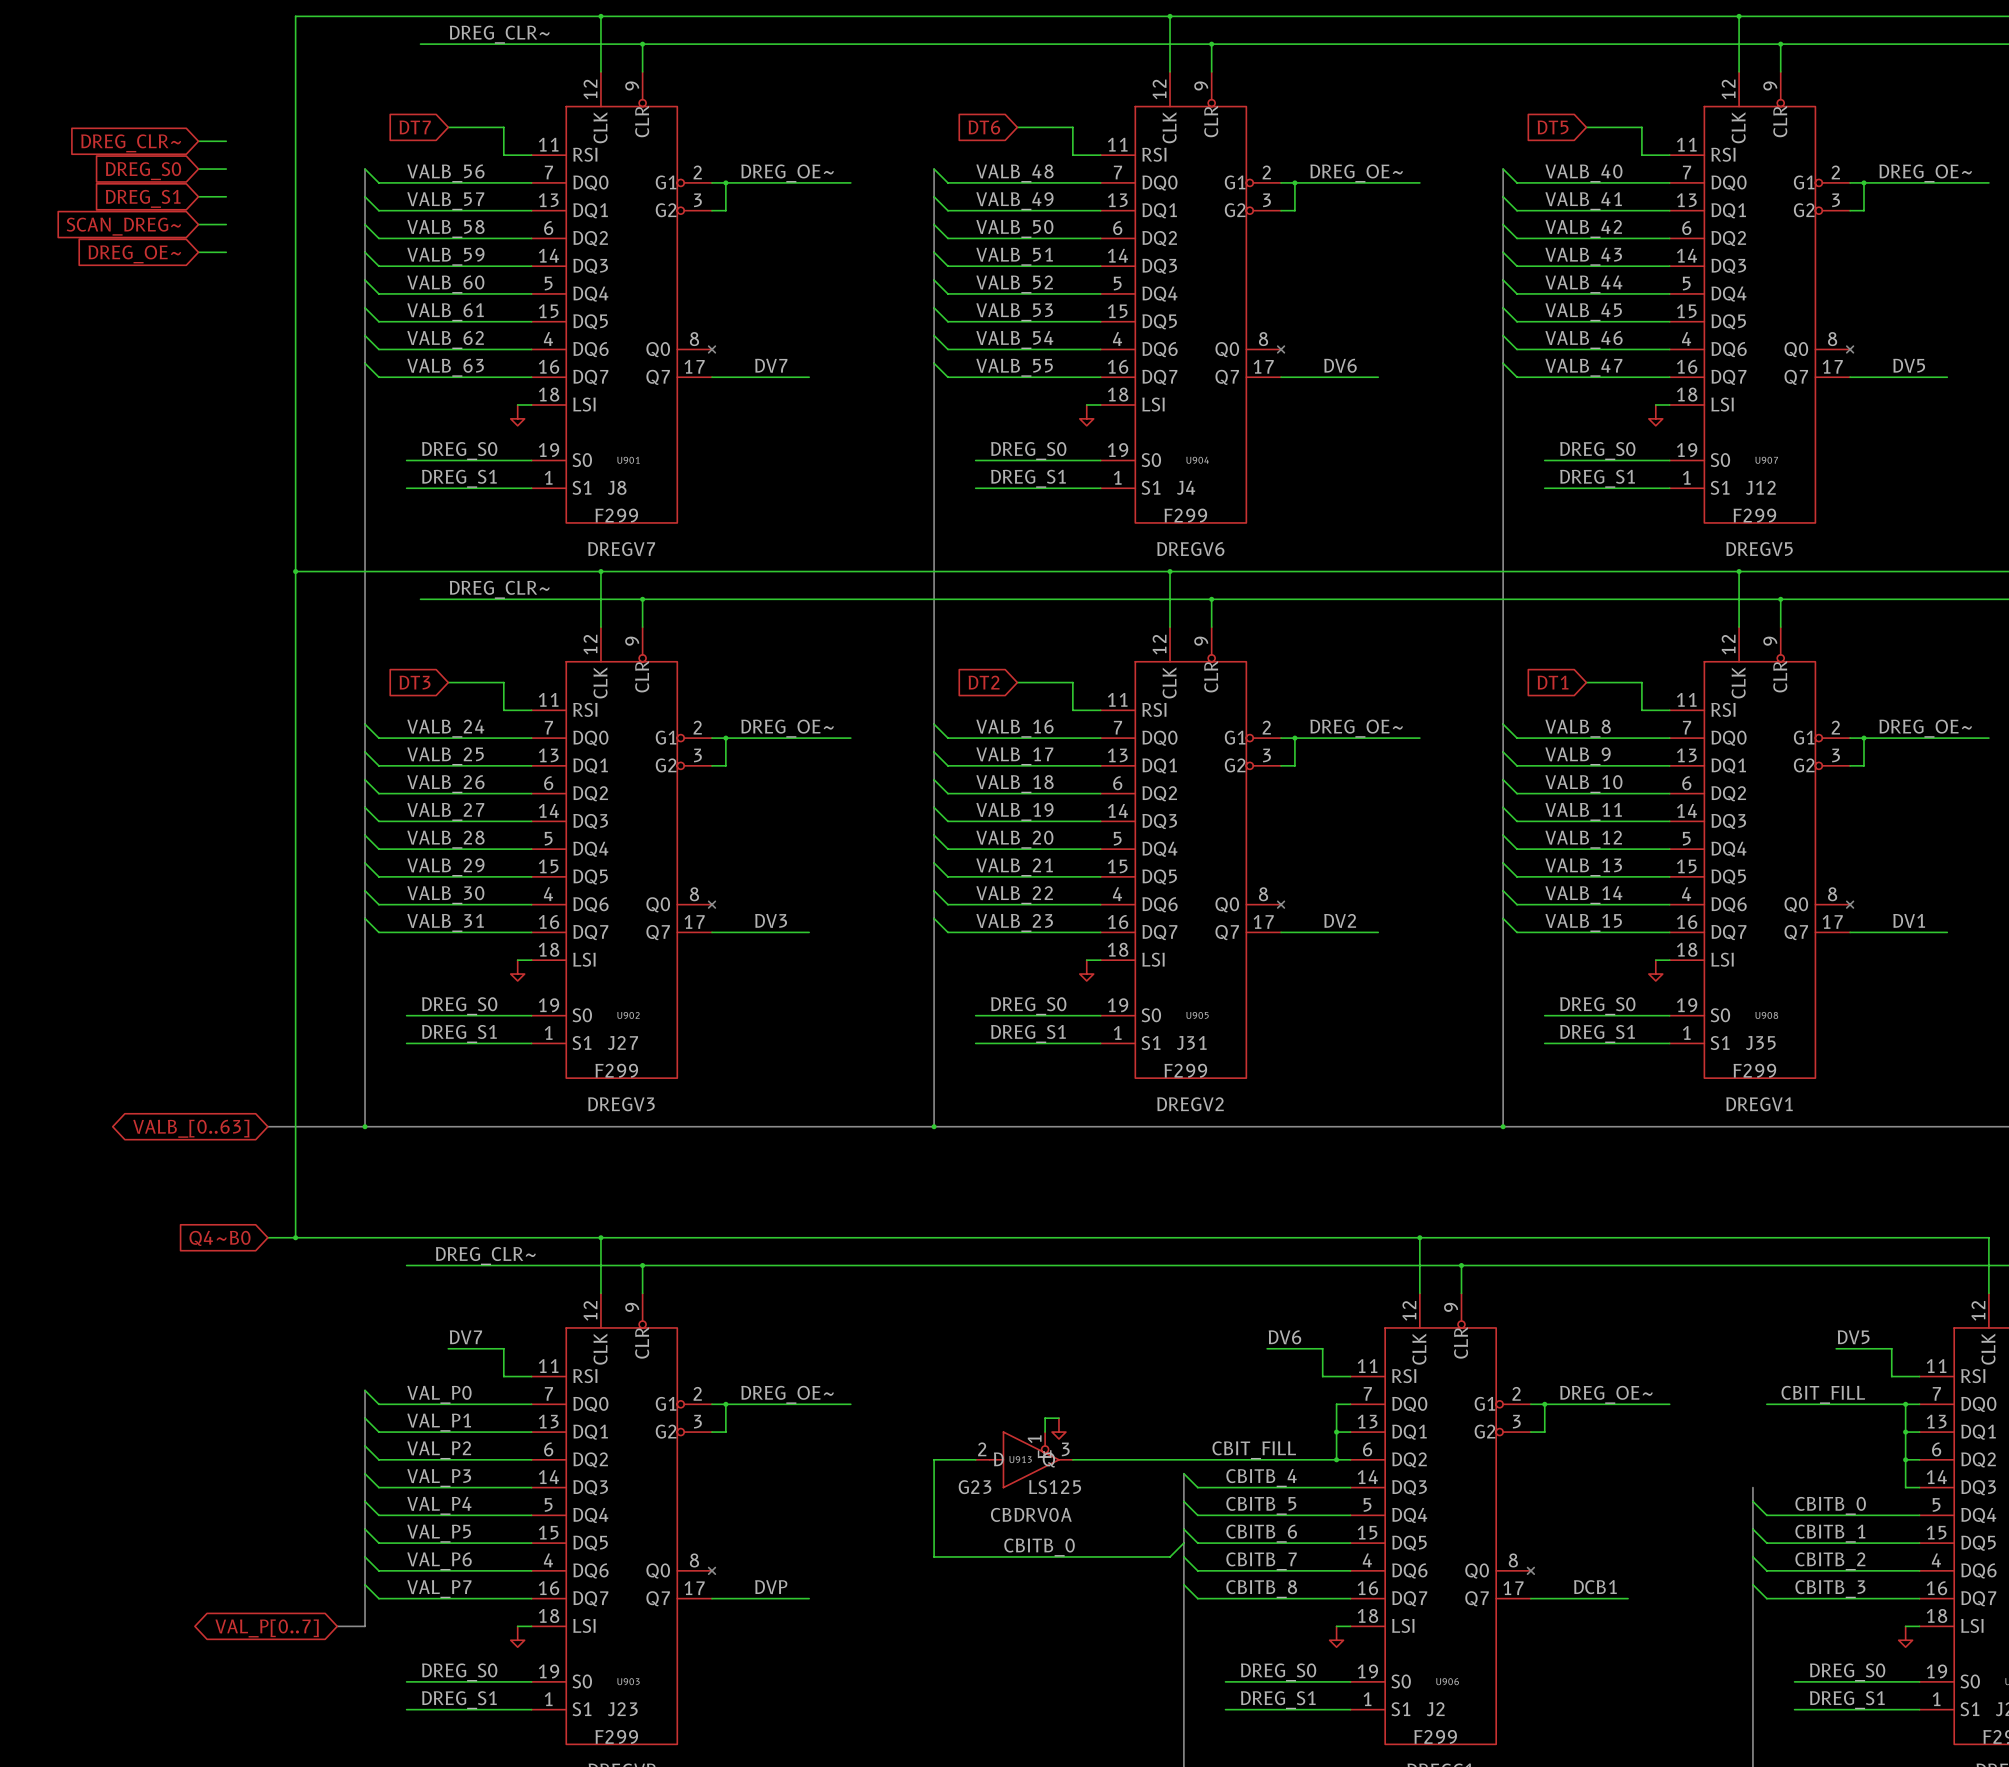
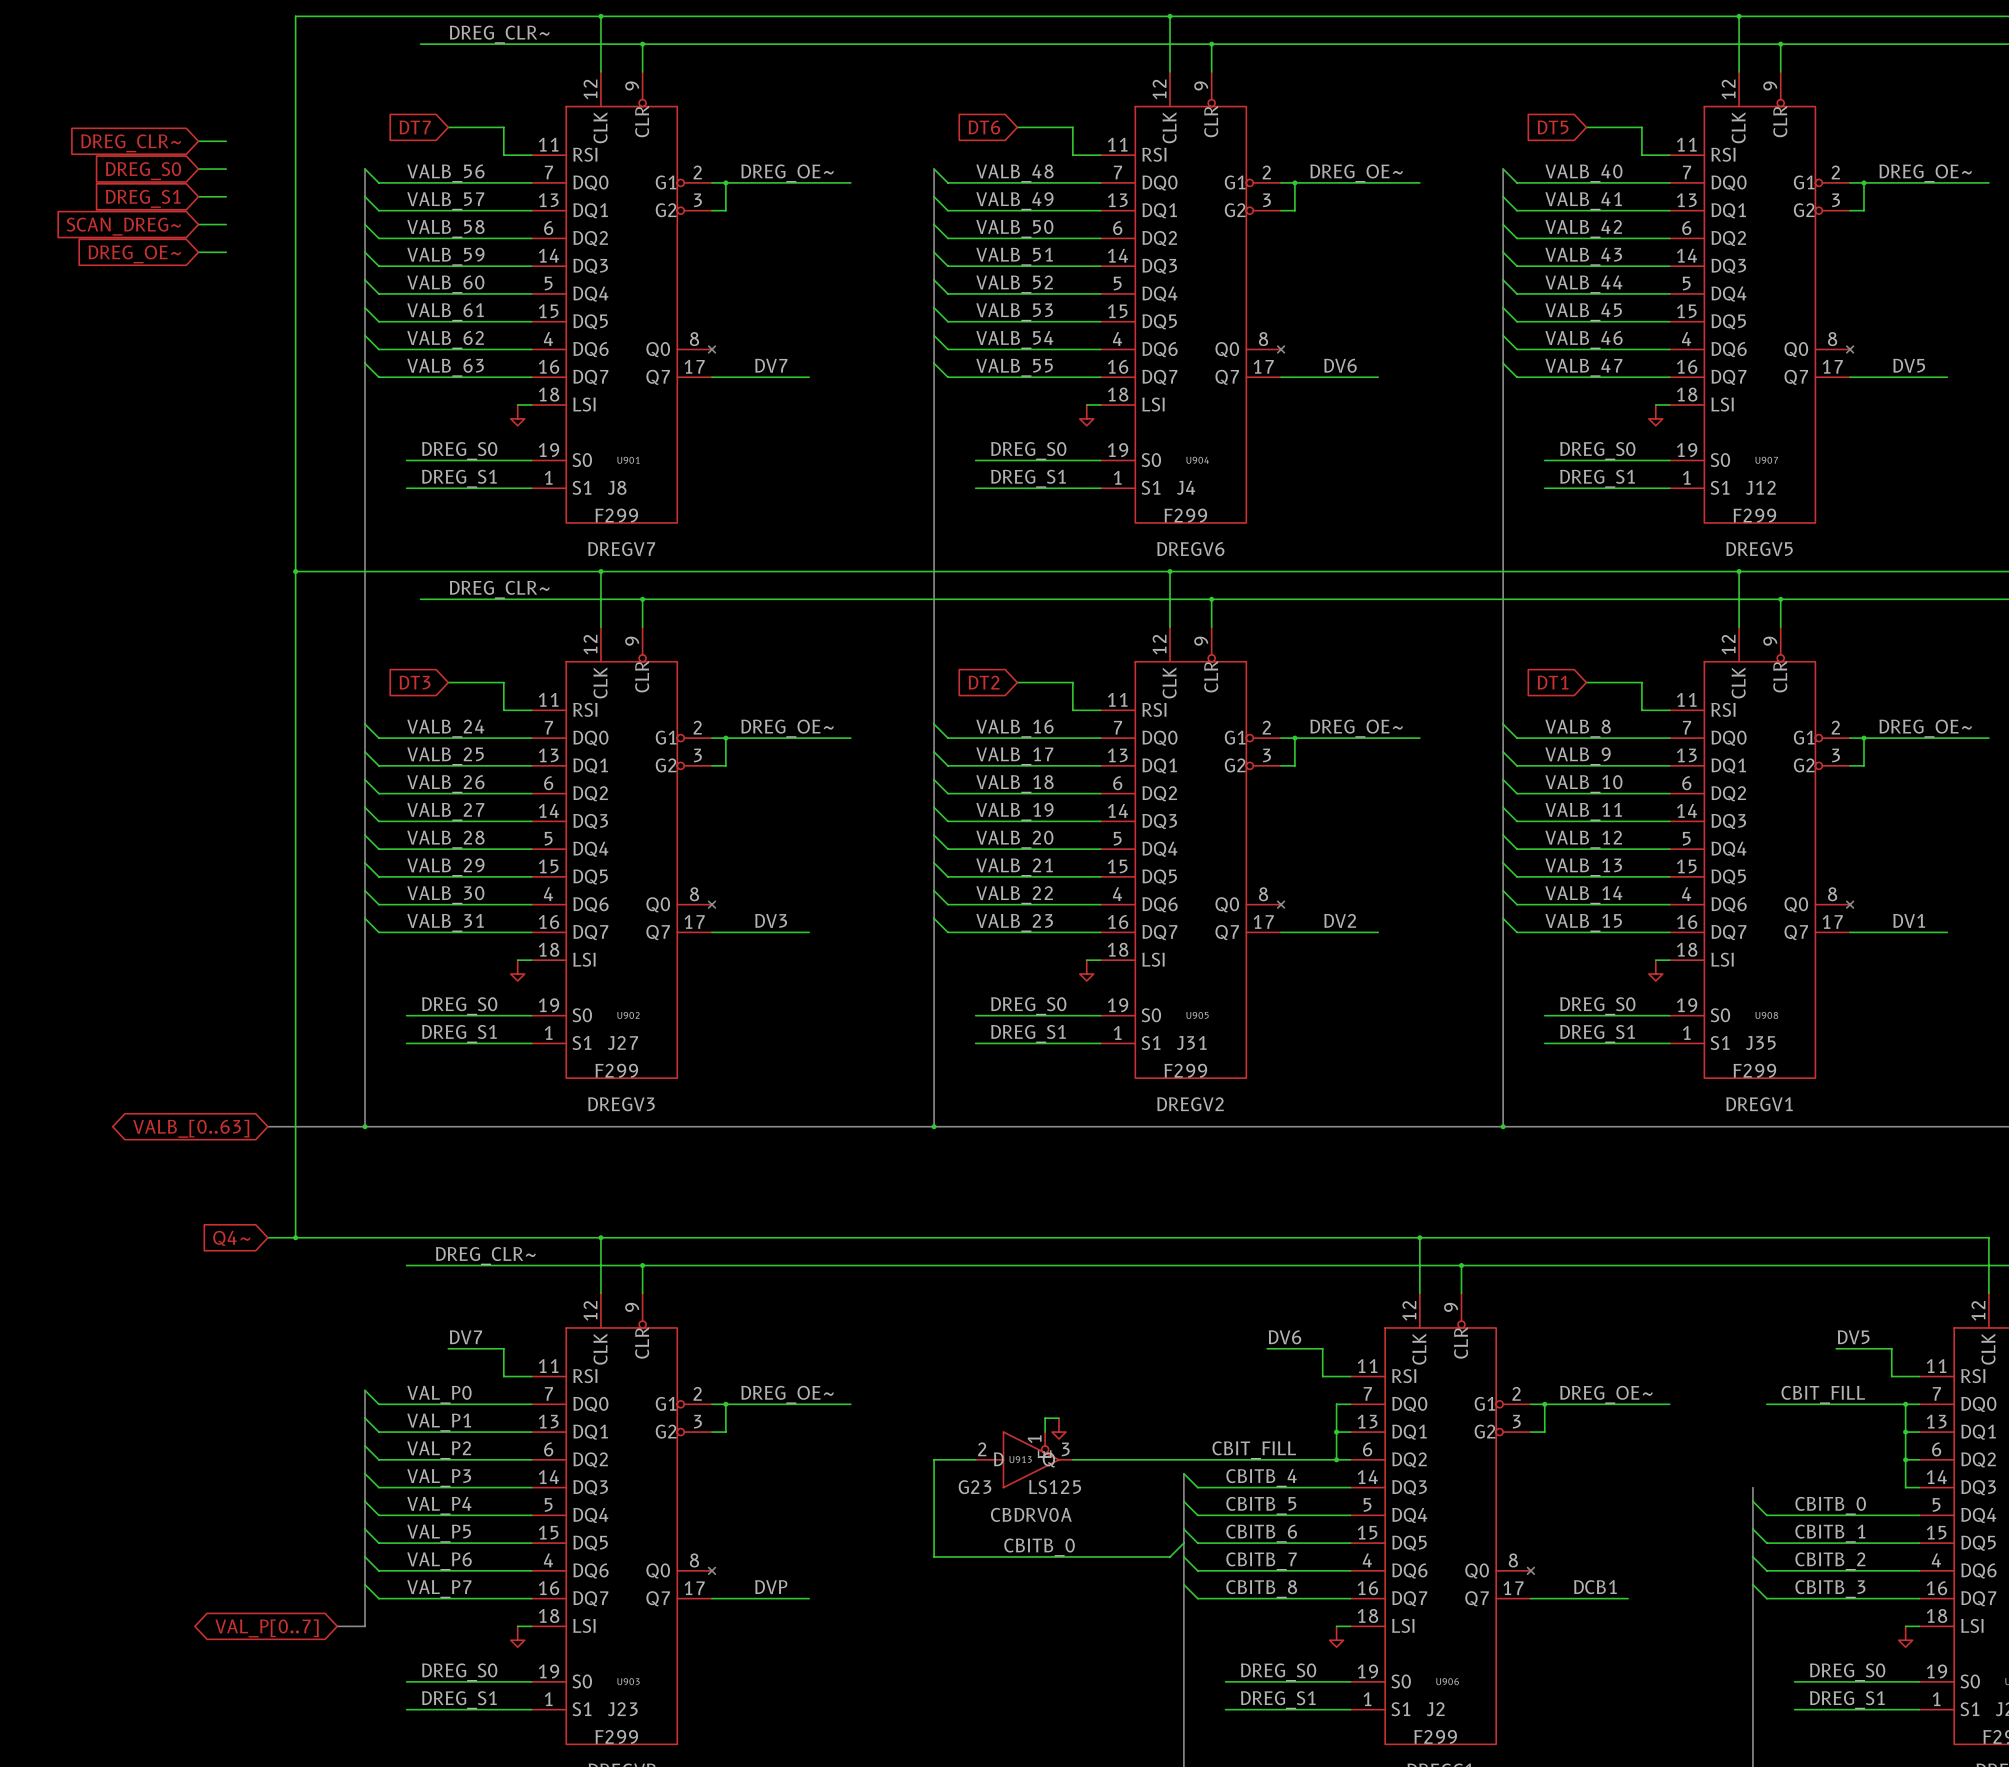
global label: Q4~B0 (219, 1238) -> Q4~ (231, 1238)

